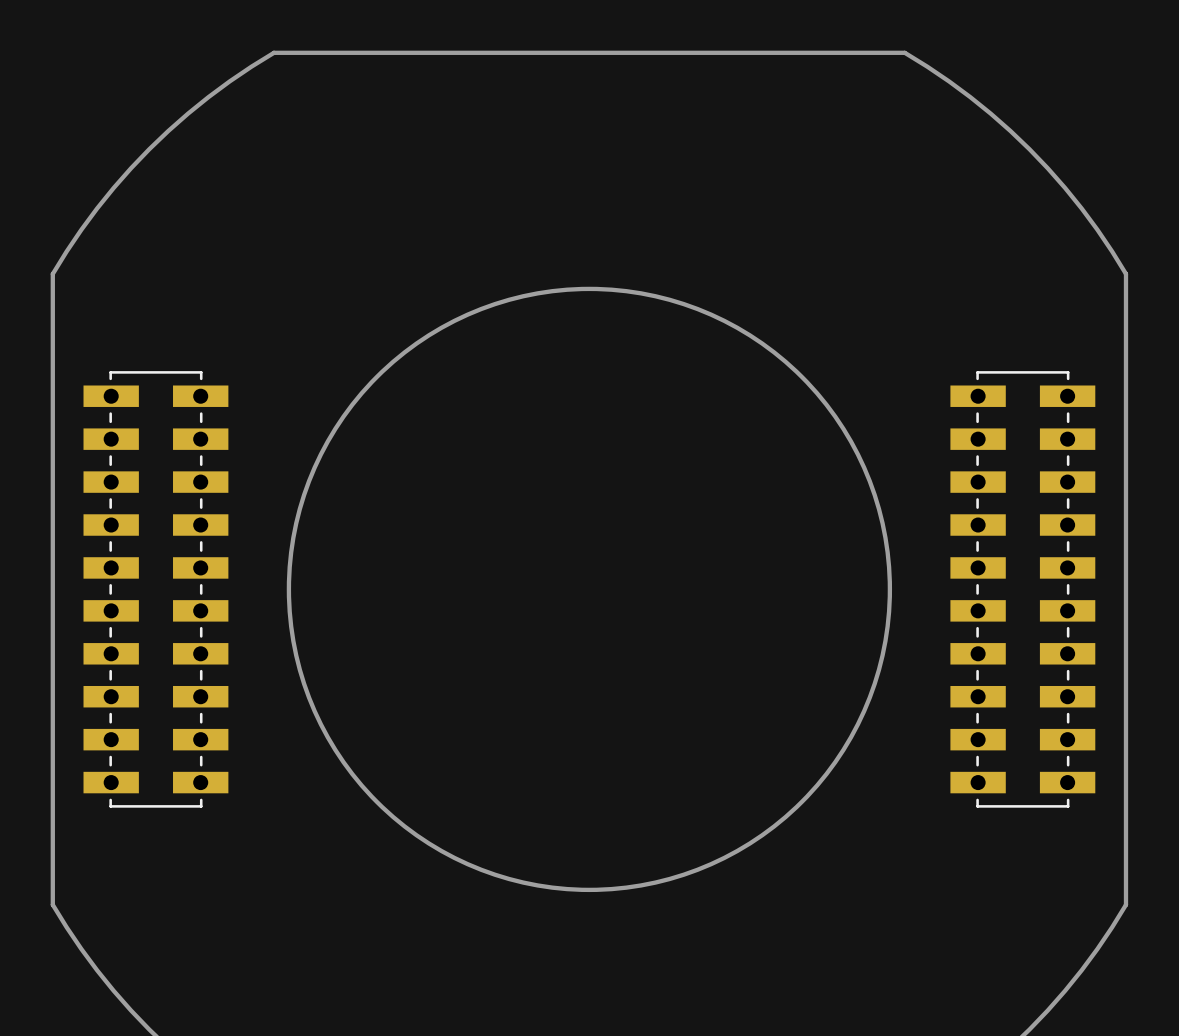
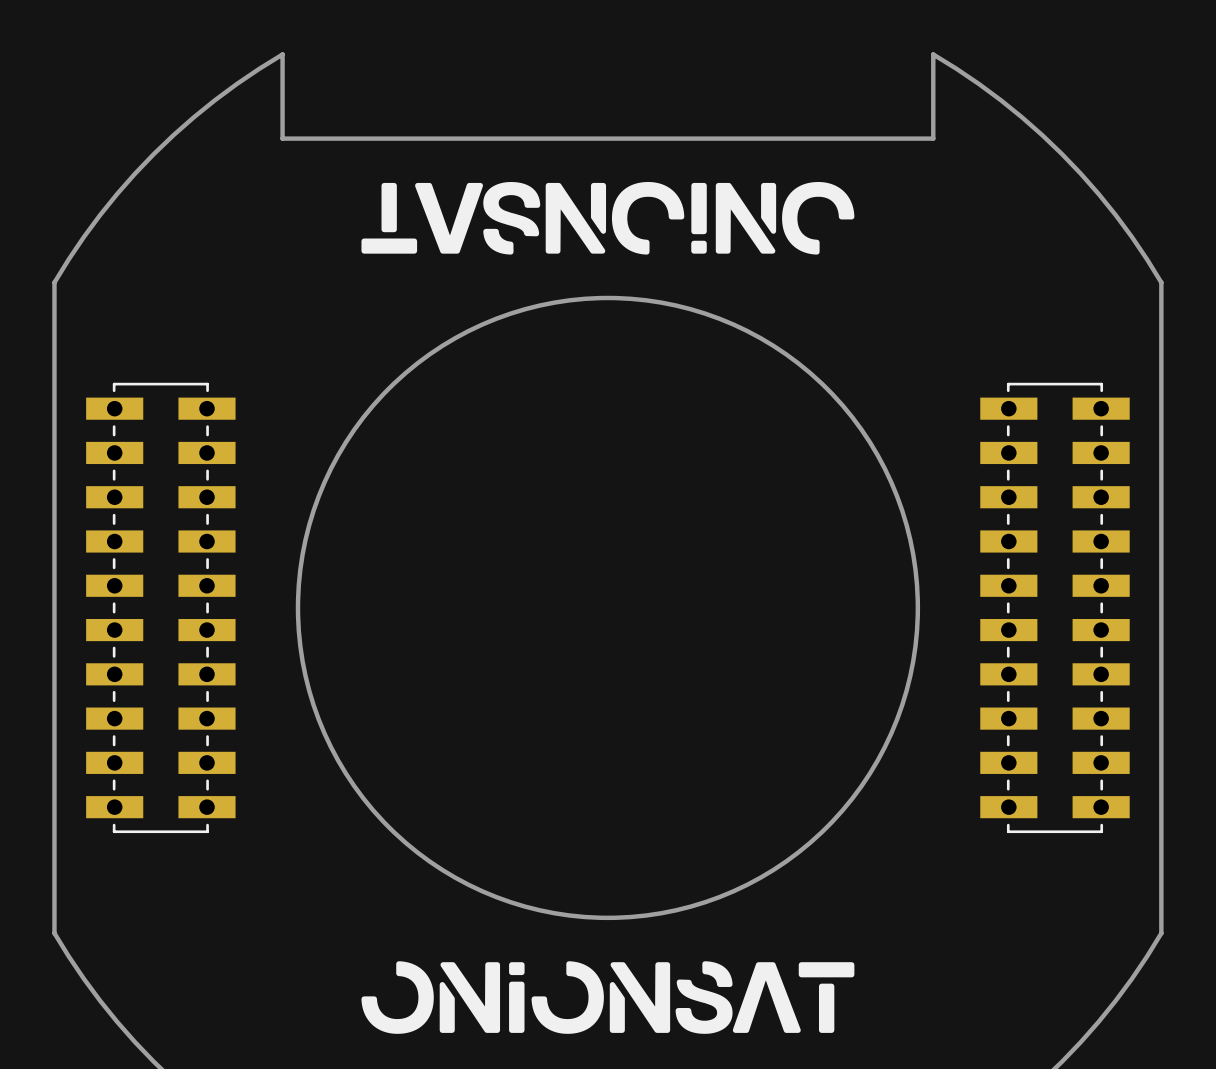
board edge: (273, 52) (904, 52) -> (282, 54) (282, 138) (933, 138) (933, 54)
drawing: none -> [361, 181, 855, 255]
drawing: none -> [361, 961, 855, 1034]

